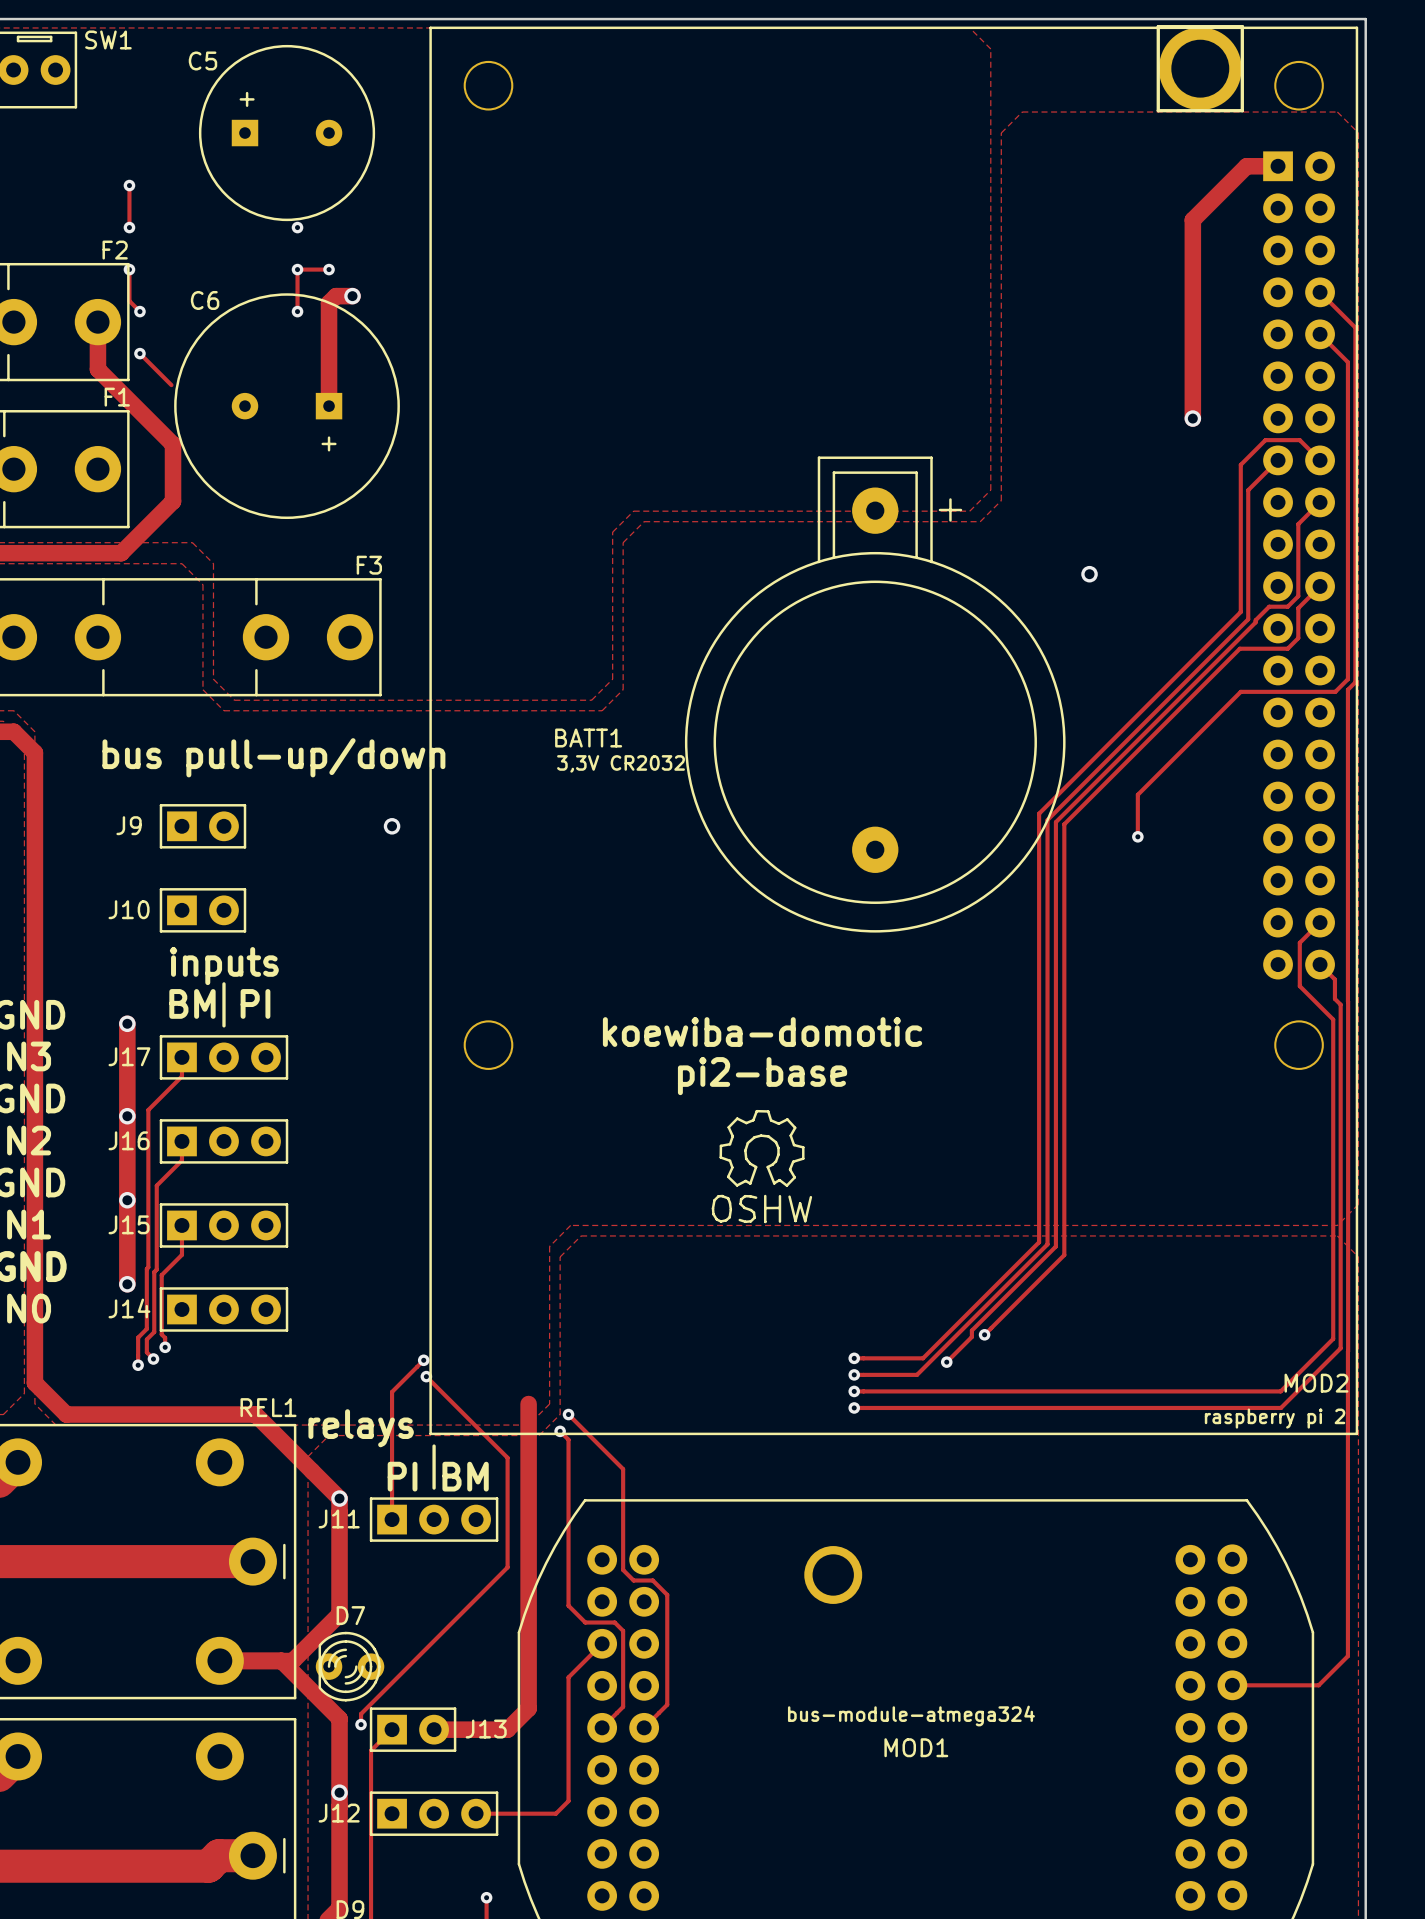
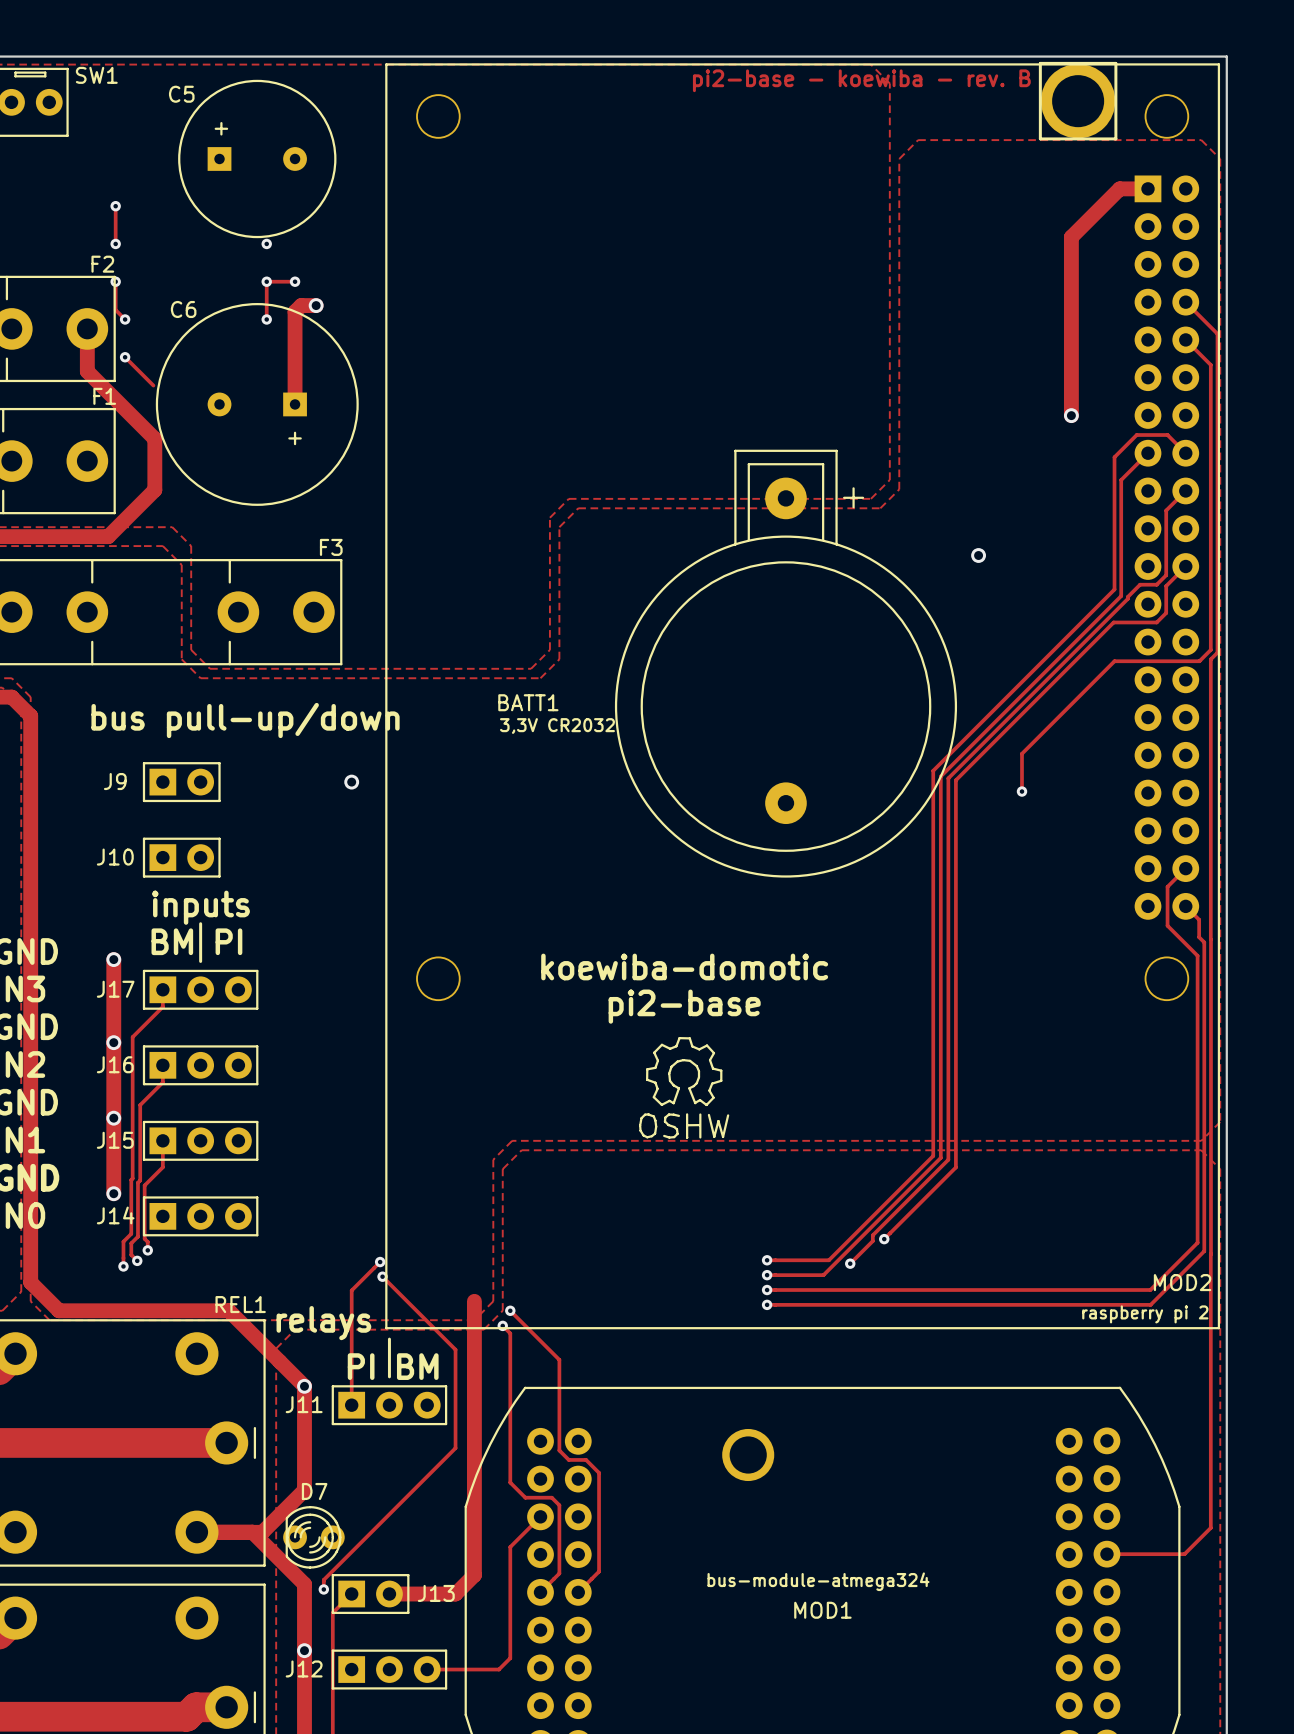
text: none -> pi2-base - koewiba - rev. B (861, 80)

